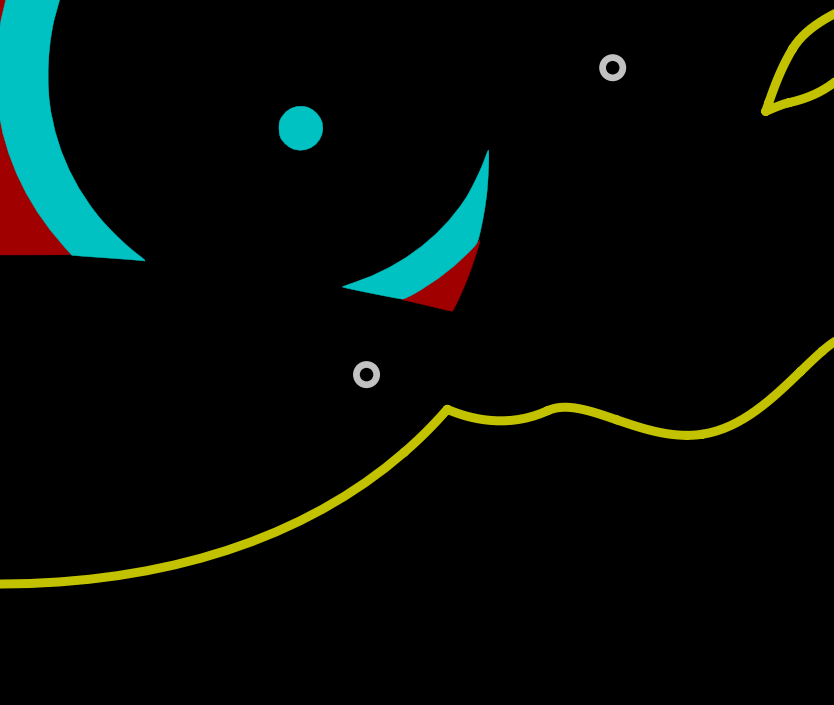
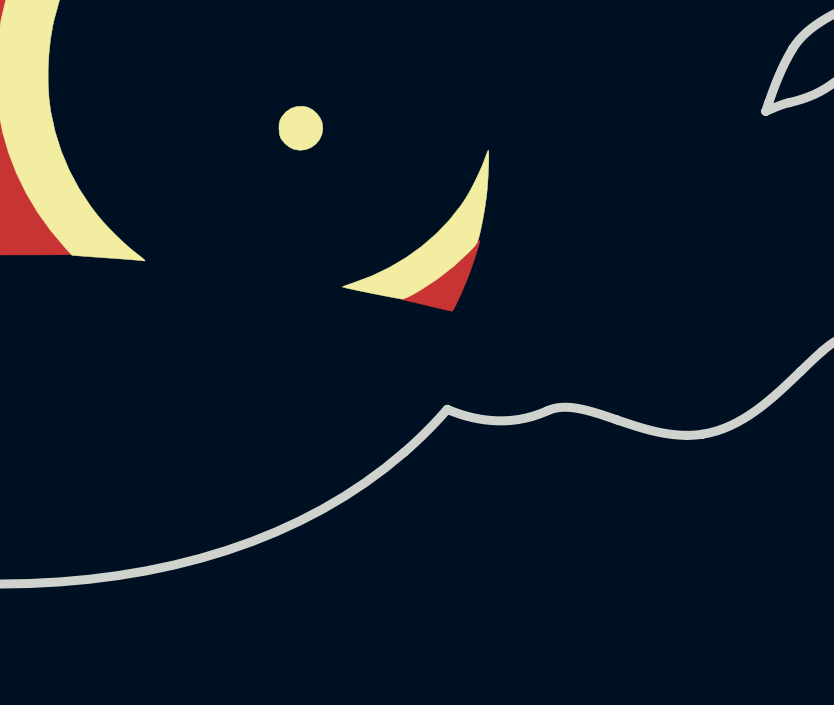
via: (612, 67) -> none
via: (366, 374) -> none

